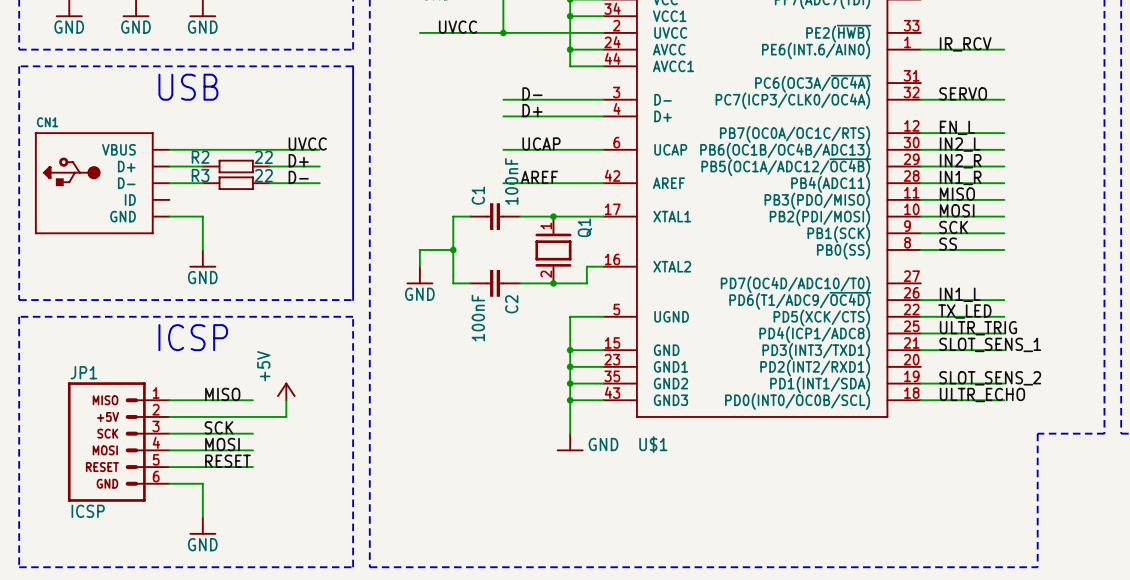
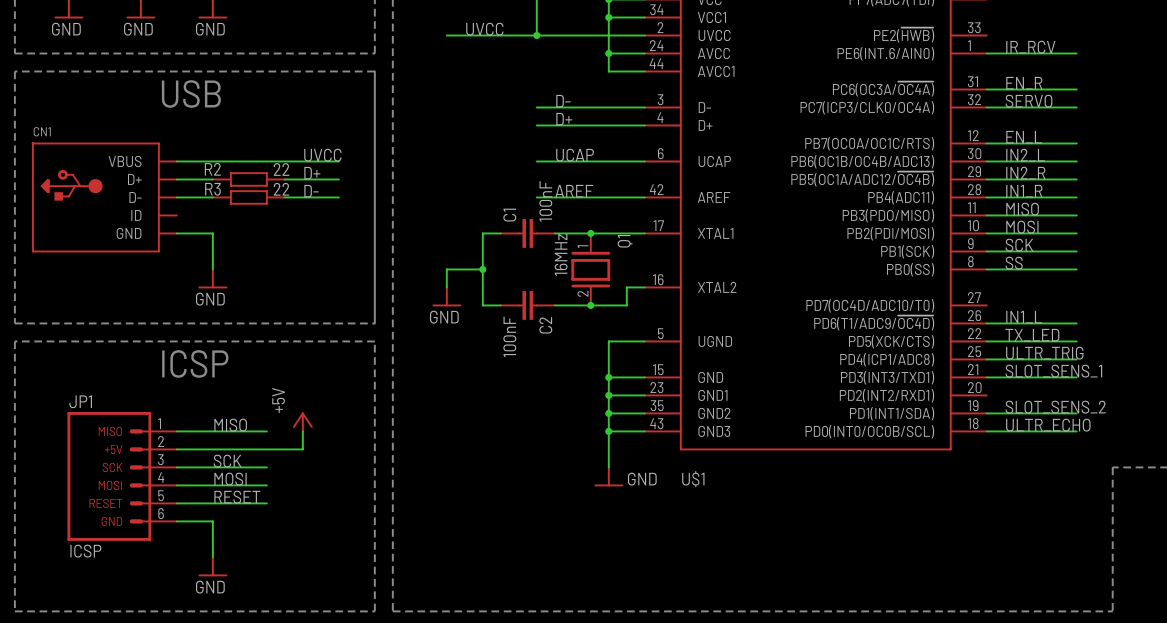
label: none -> EN_R (1024, 83)
wire: none -> (986, 89) (1076, 89)
Q1 value: none -> 16MHz (561, 254)

